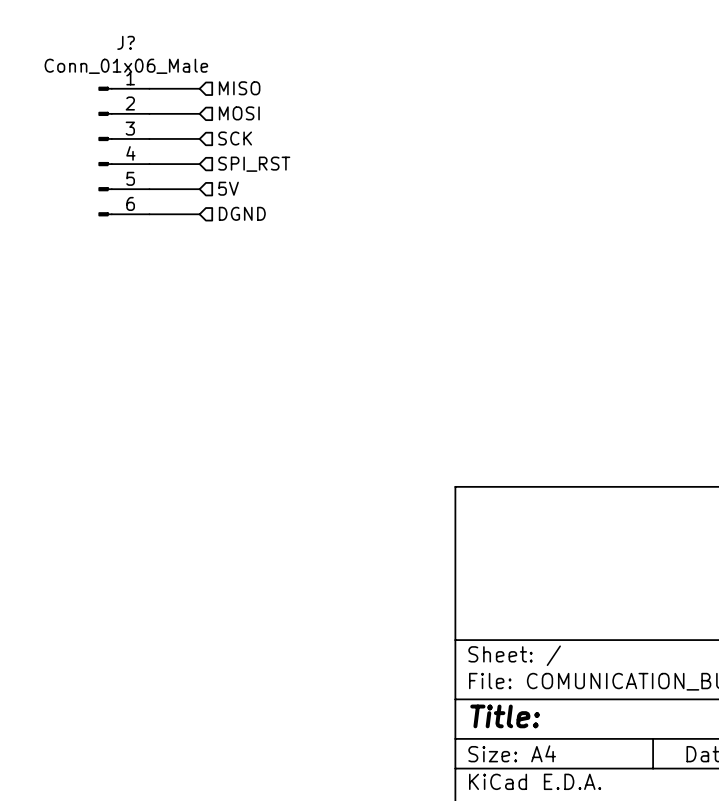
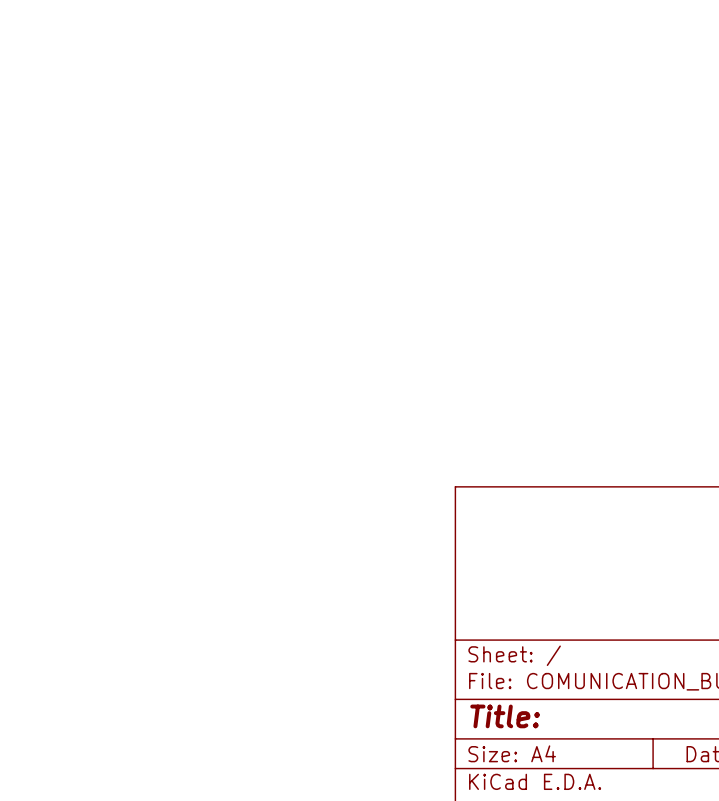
wire: (149, 88) (199, 88) -> none
hierarchical label: MISO (239, 88) -> none
wire: (149, 113) (199, 113) -> none
hierarchical label: MOSI (239, 113) -> none
wire: (149, 138) (199, 138) -> none
hierarchical label: SCK (235, 138) -> none
J?: Conn_01x06_Male (123, 151) -> none
wire: (149, 164) (199, 164) -> none
hierarchical label: SPI_RST (254, 164) -> none
hierarchical label: 5V (228, 188) -> none
wire: (149, 189) (199, 189) -> none
hierarchical label: DGND (242, 213) -> none
wire: (149, 214) (199, 214) -> none

